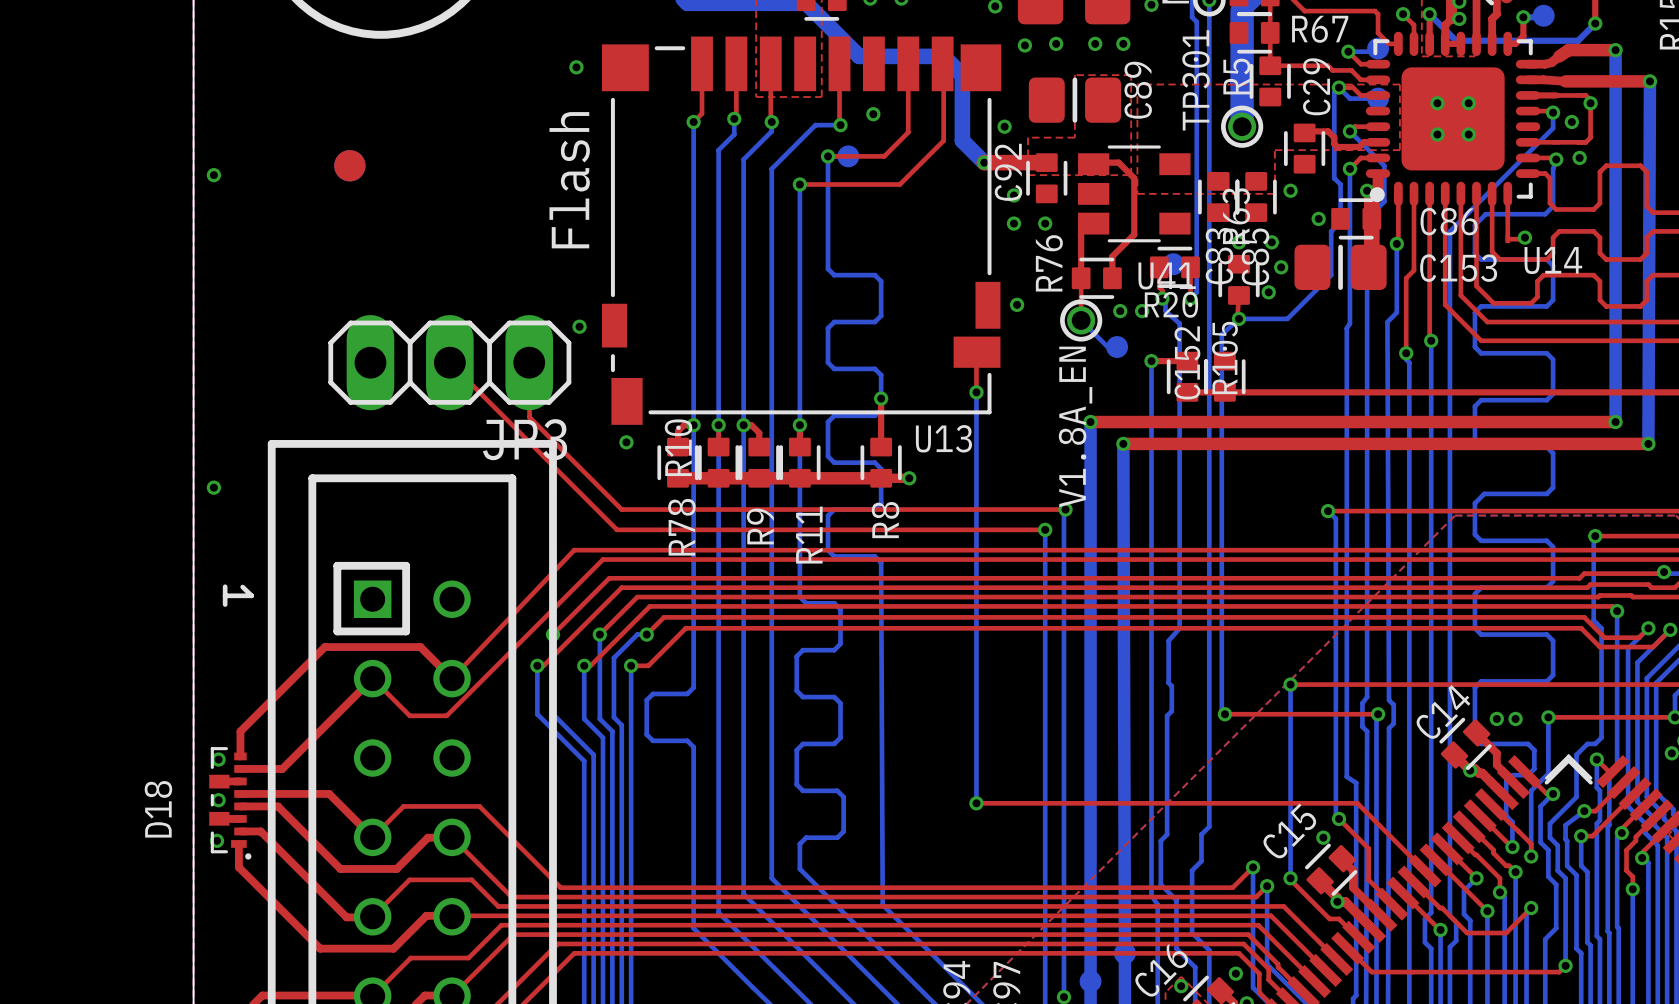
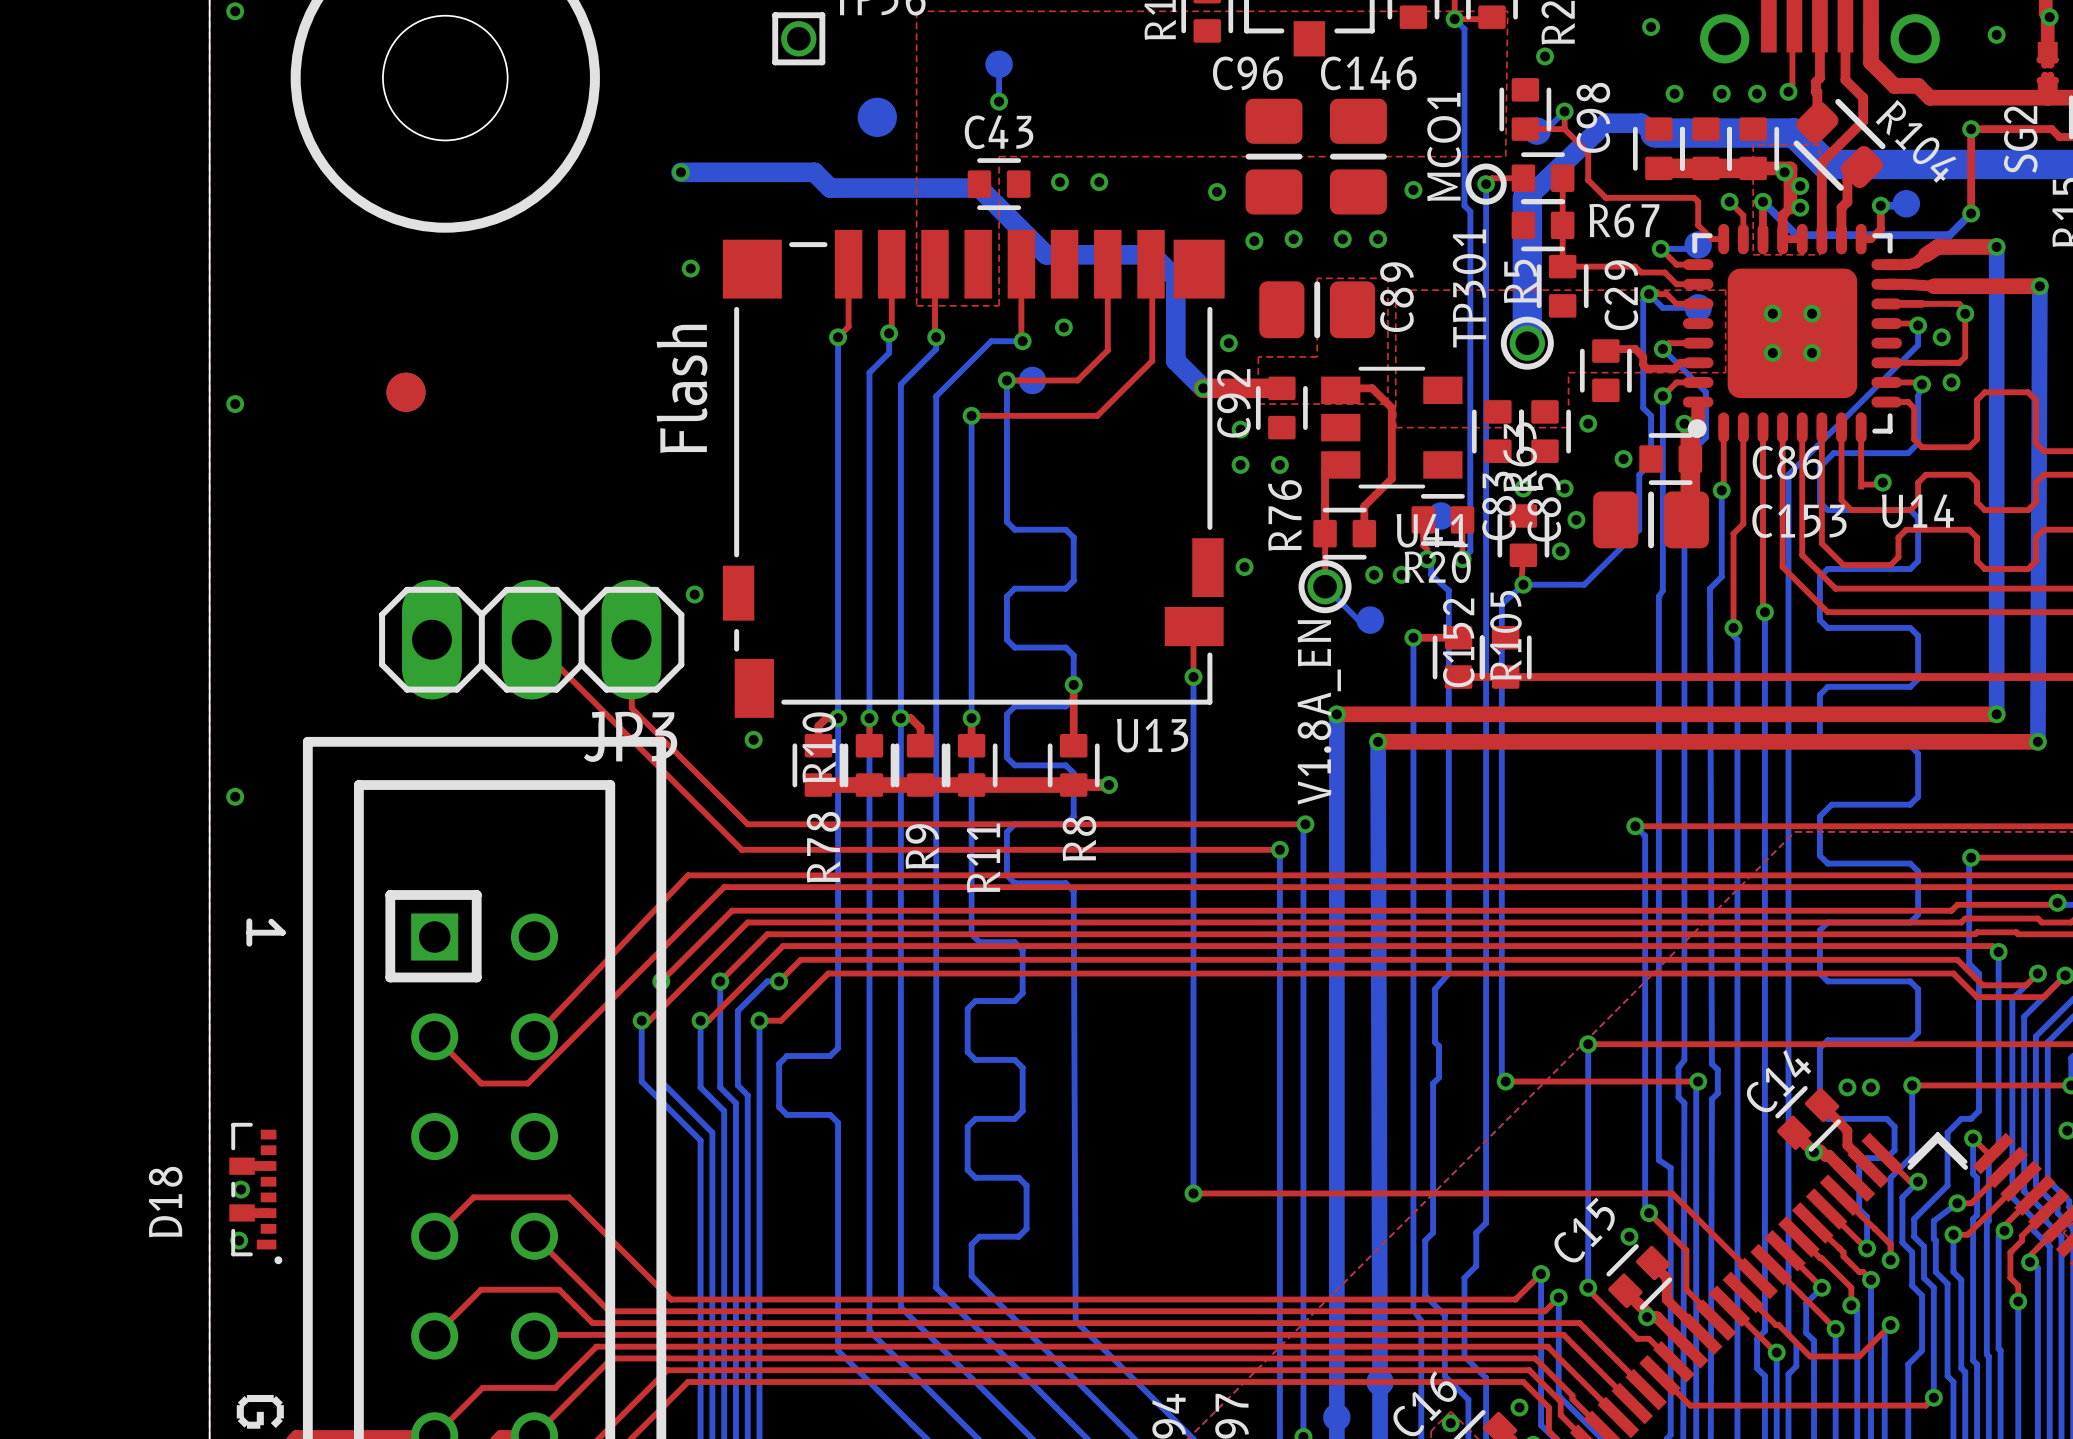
top track: (372, 678) (282, 768) (240, 768) -> none
top track: (452, 678) (420, 647) (324, 647) (240, 731) (240, 756) -> none
via: (218, 759) -> none
top track: (240, 793) (329, 793) (372, 837) -> none
top track: (240, 806) (277, 806) (340, 868) (396, 868) (427, 837) (451, 837) -> none
top track: (240, 831) (260, 831) (346, 917) (372, 916) -> none
top track: (238, 843) (238, 867) (320, 948) (393, 948) (426, 915) (452, 916) -> none
line: none -> (260, 1411) (260, 1425) (246, 1425) (240, 1418) (240, 1405) (246, 1398) (273, 1398) (280, 1405) (280, 1418) (273, 1425)

